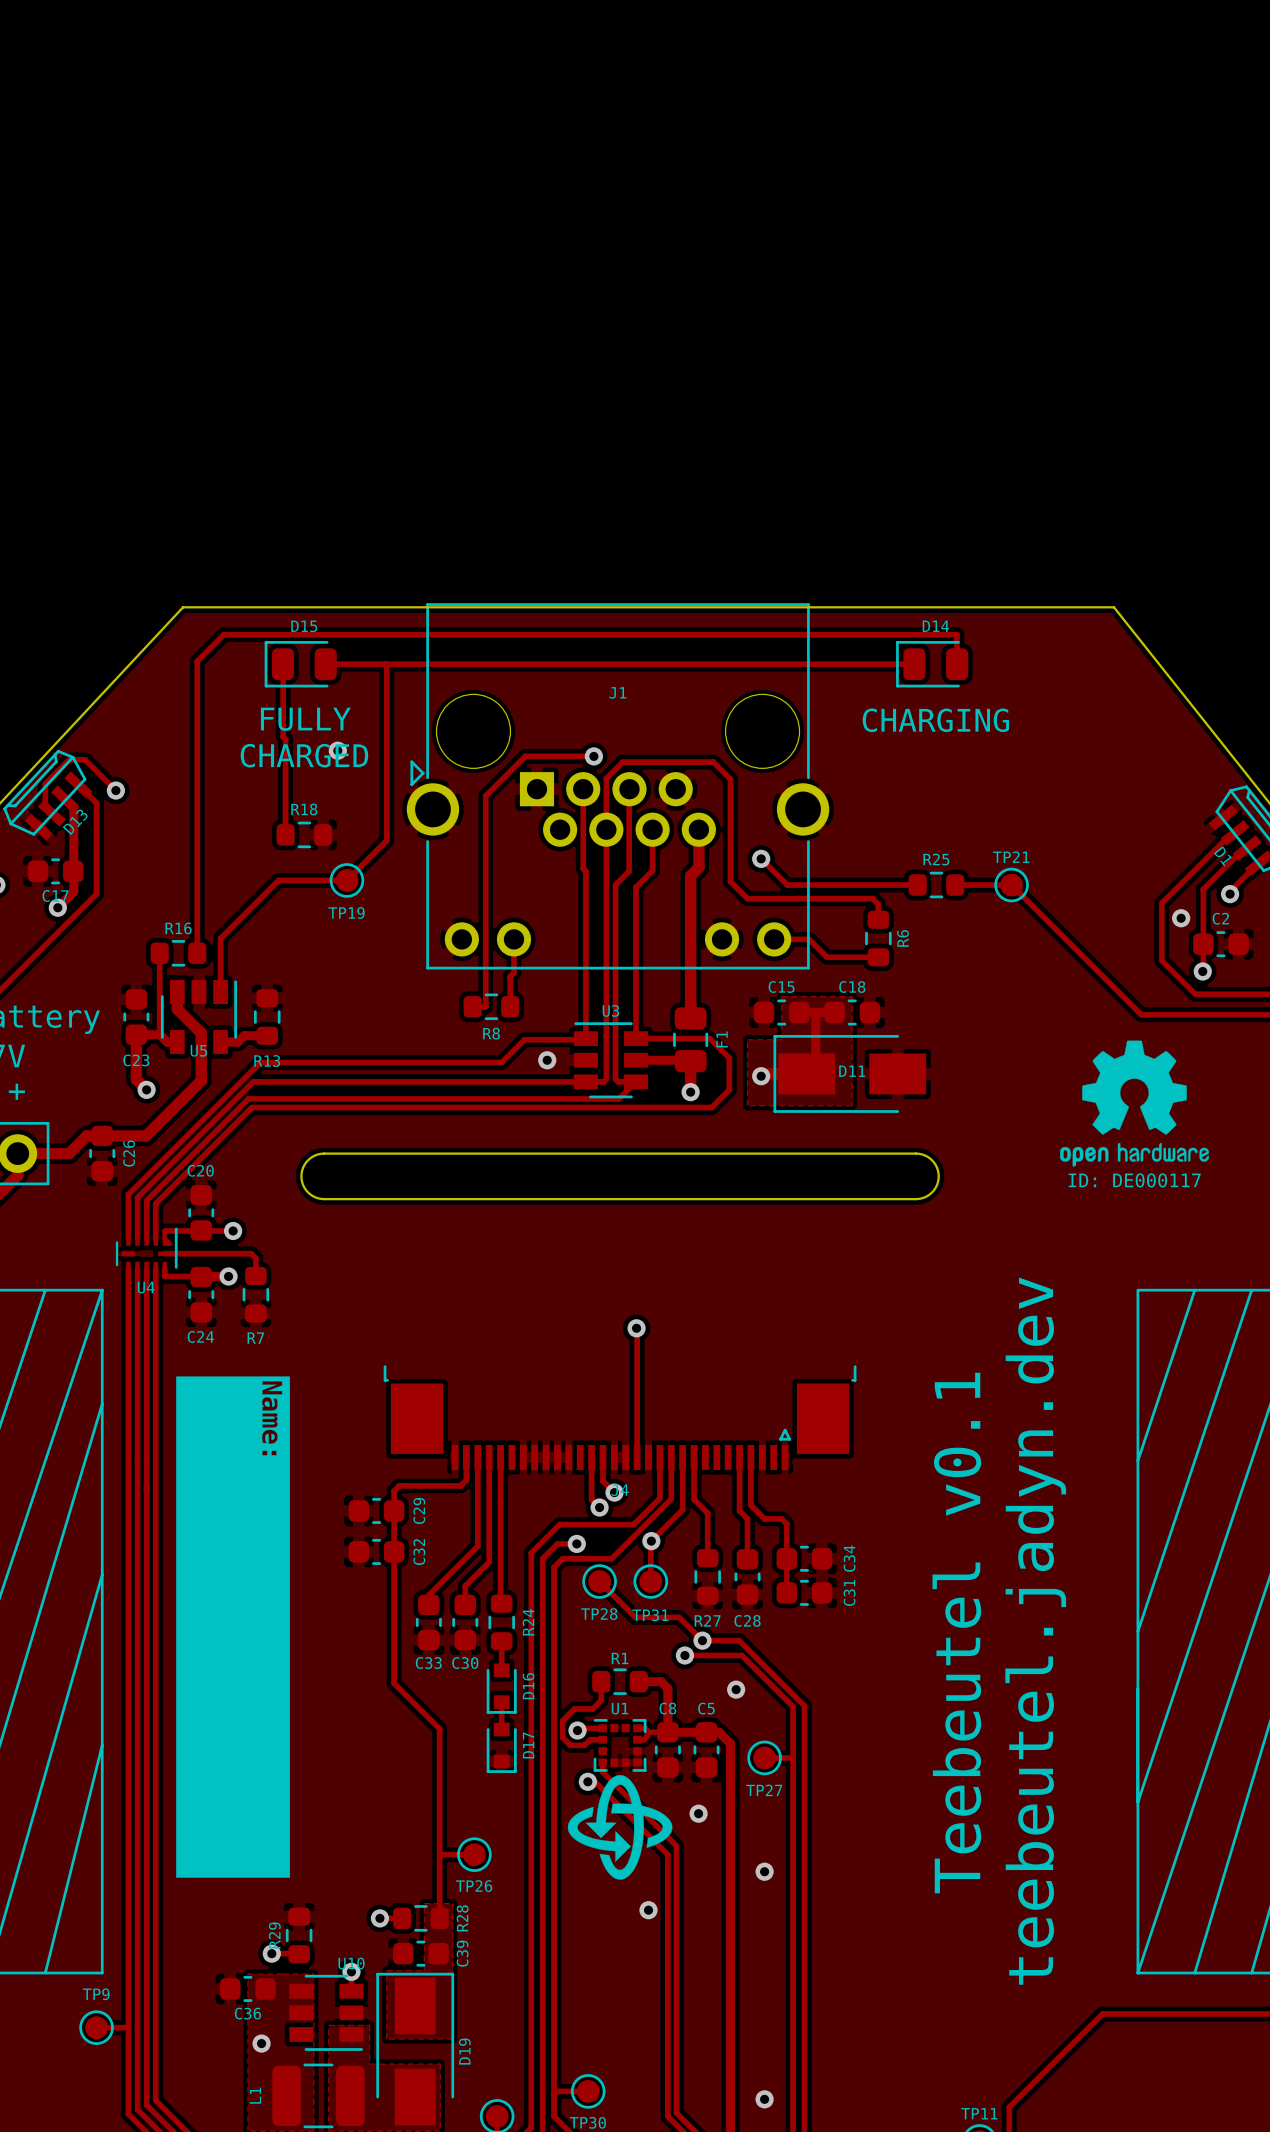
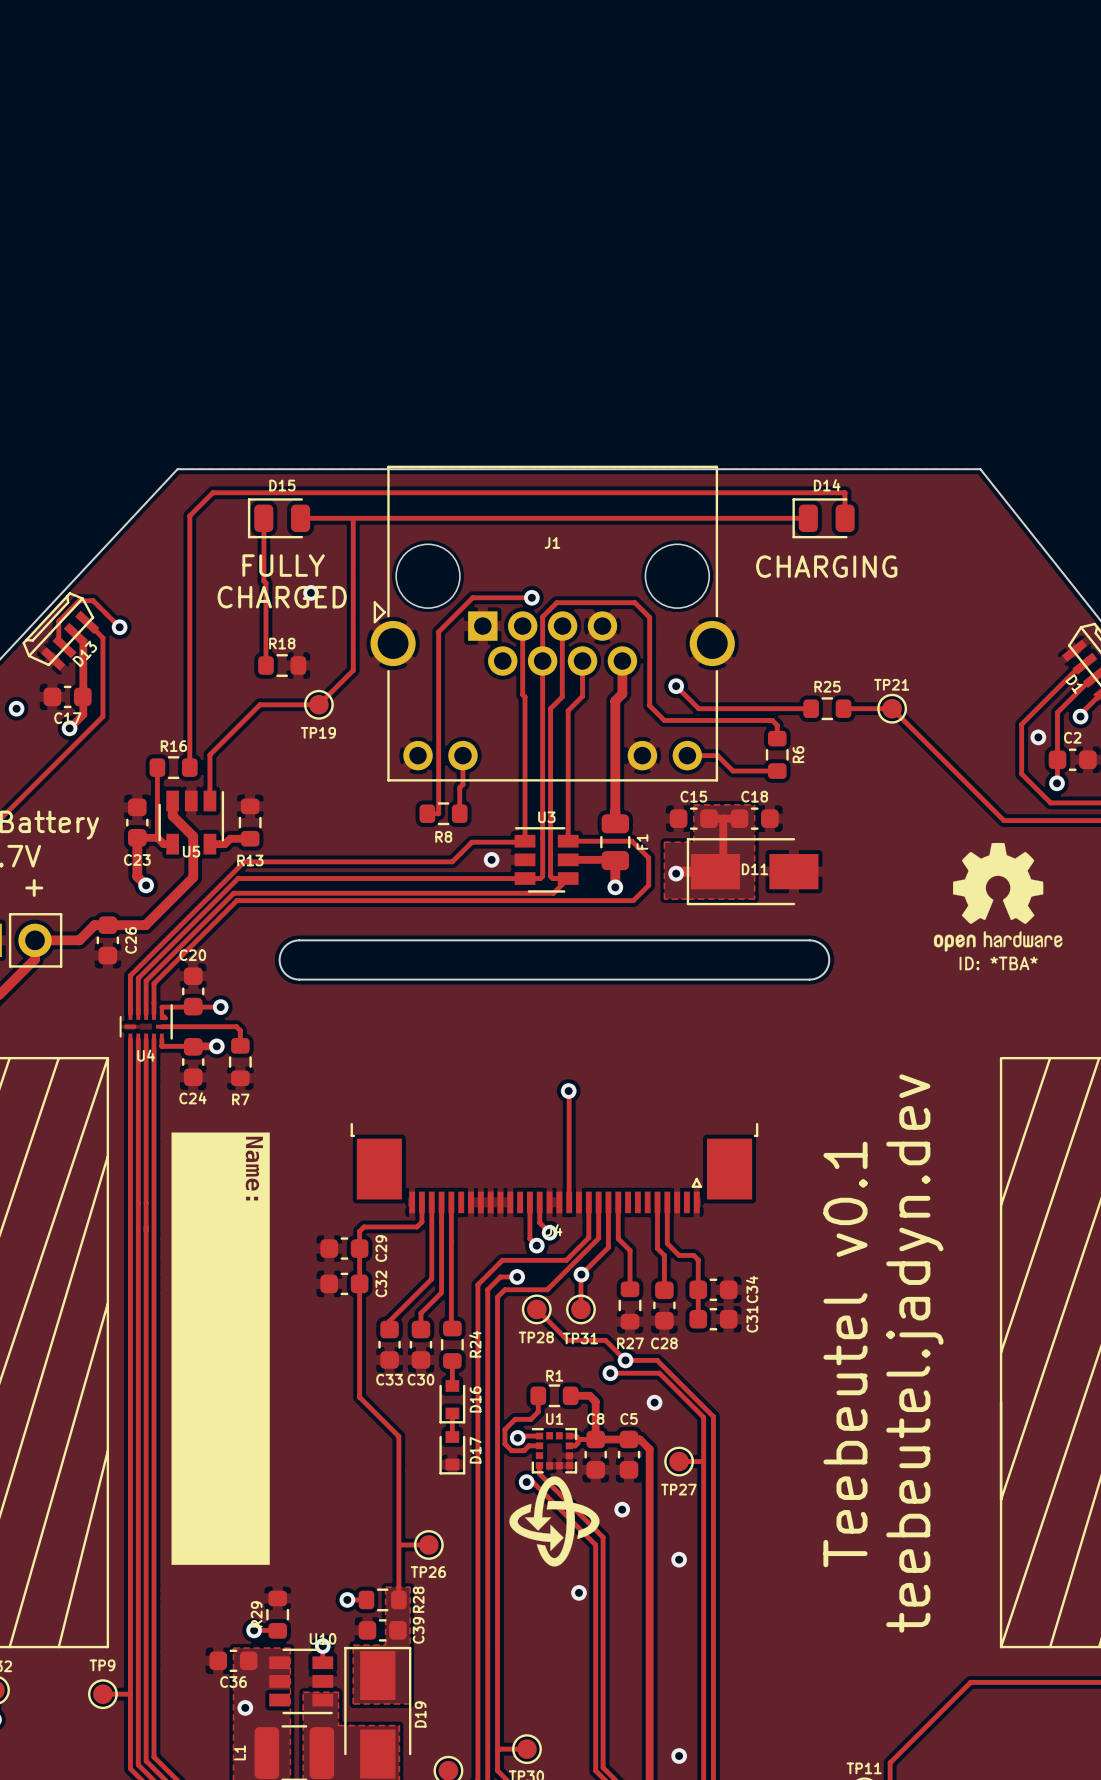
text: ID: DE000117 (1134, 1180) -> ID: *TBA* (998, 963)

